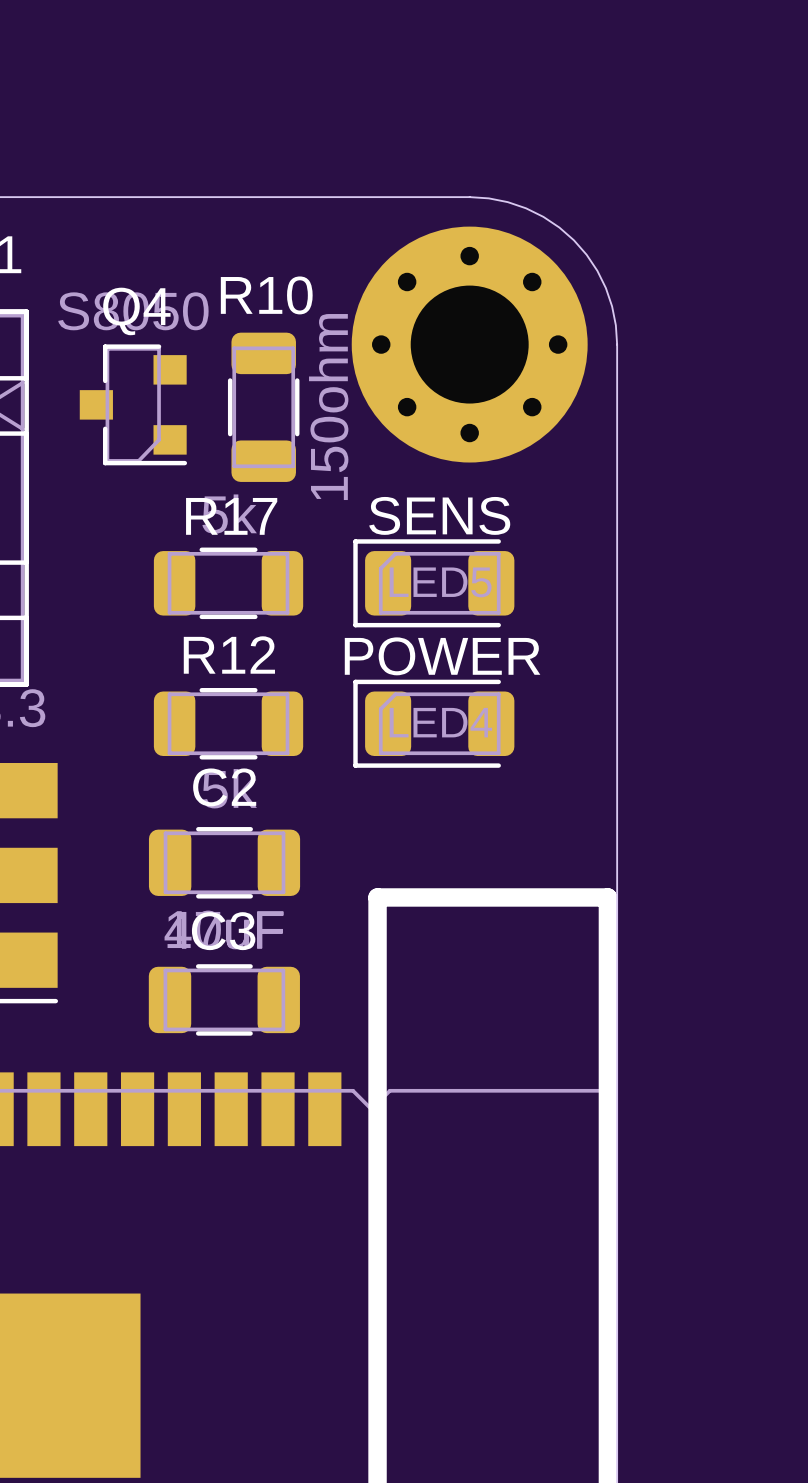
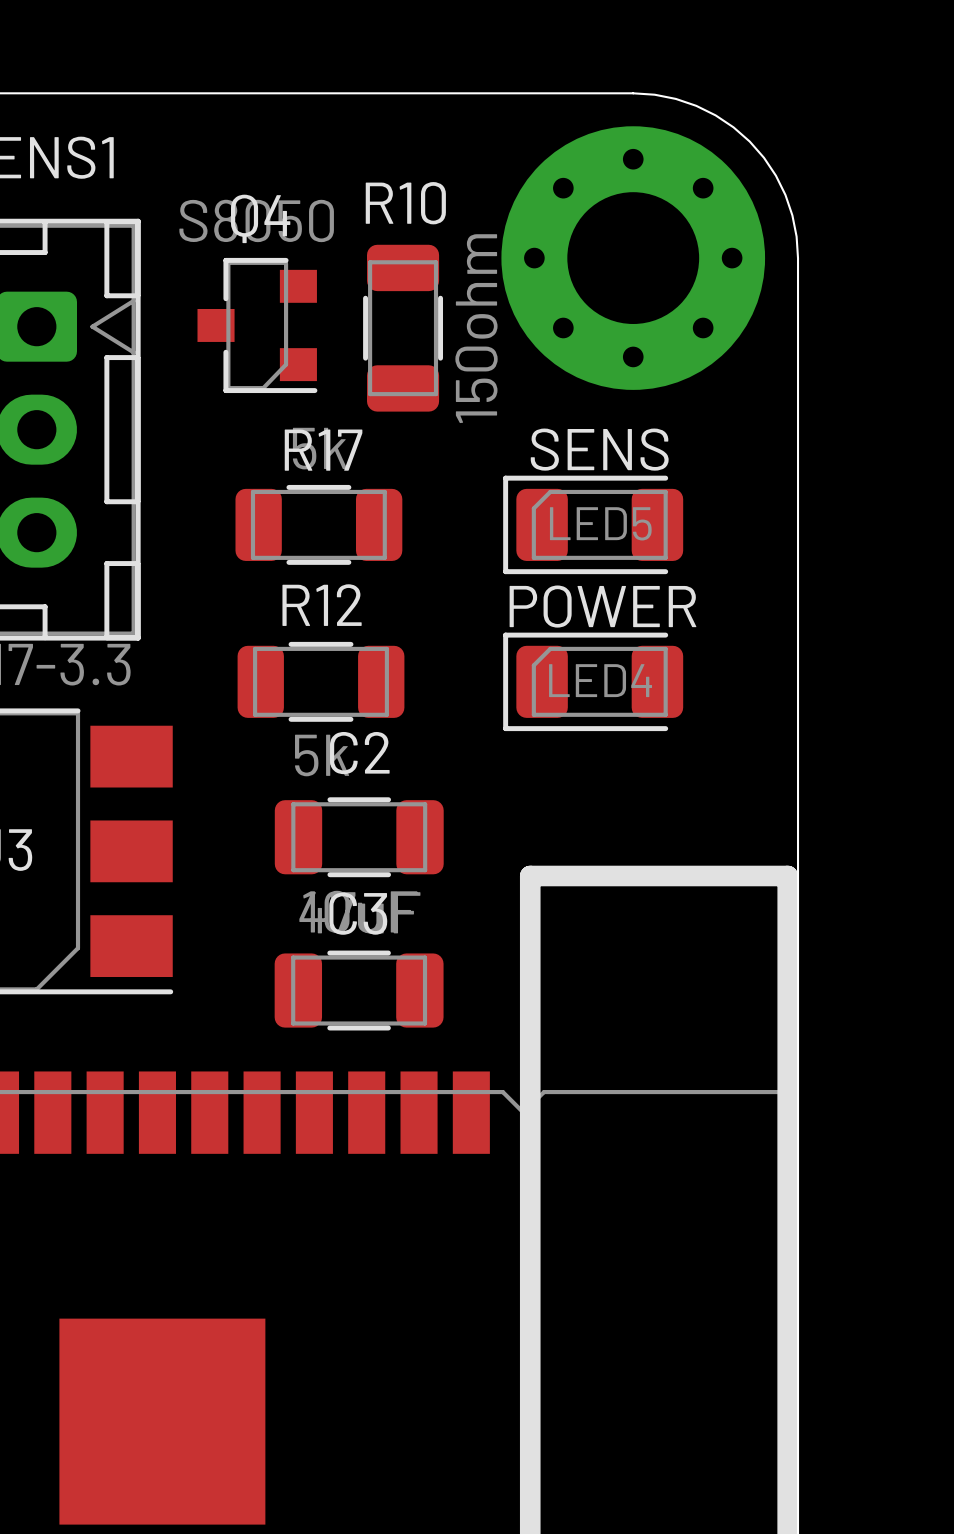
R17 position: (228, 583) -> (318, 524)
R12 position: (228, 723) -> (320, 681)

